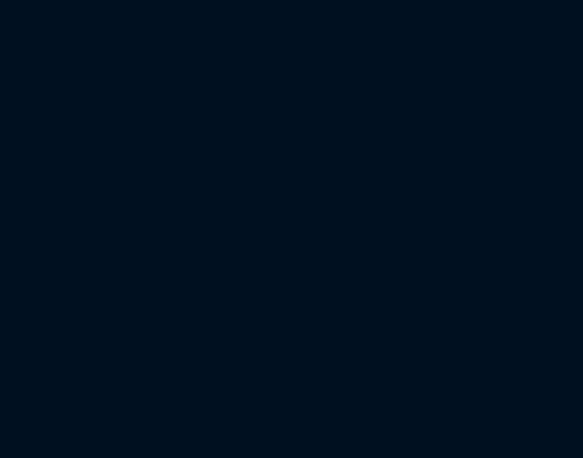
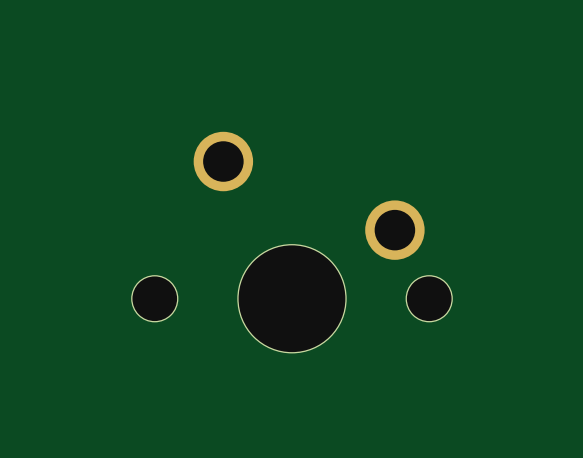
part: none -> (291, 242)

